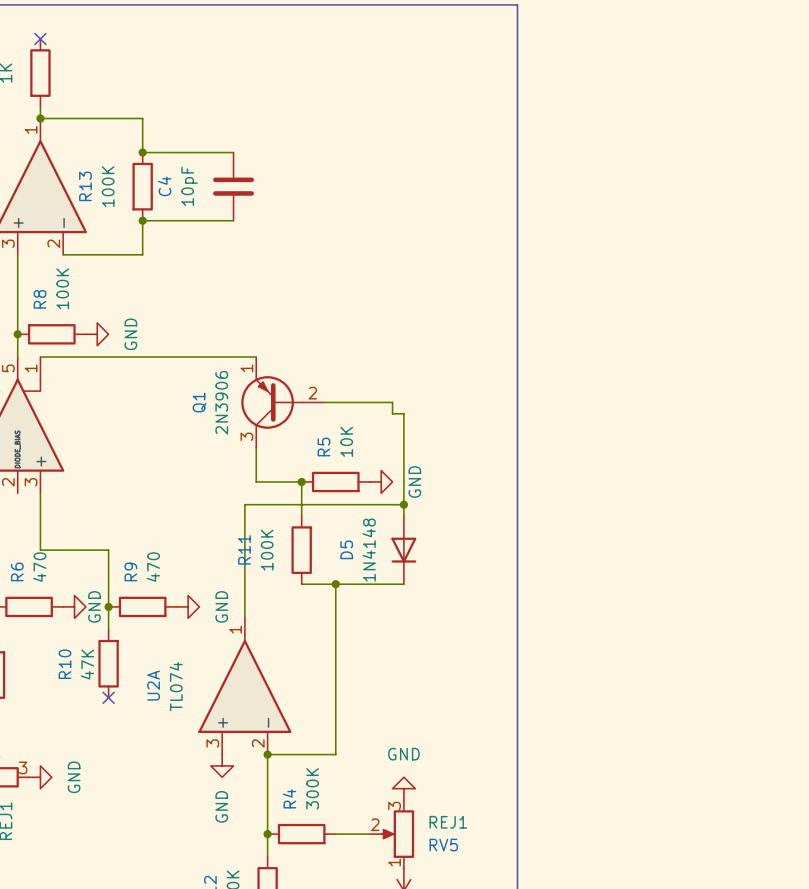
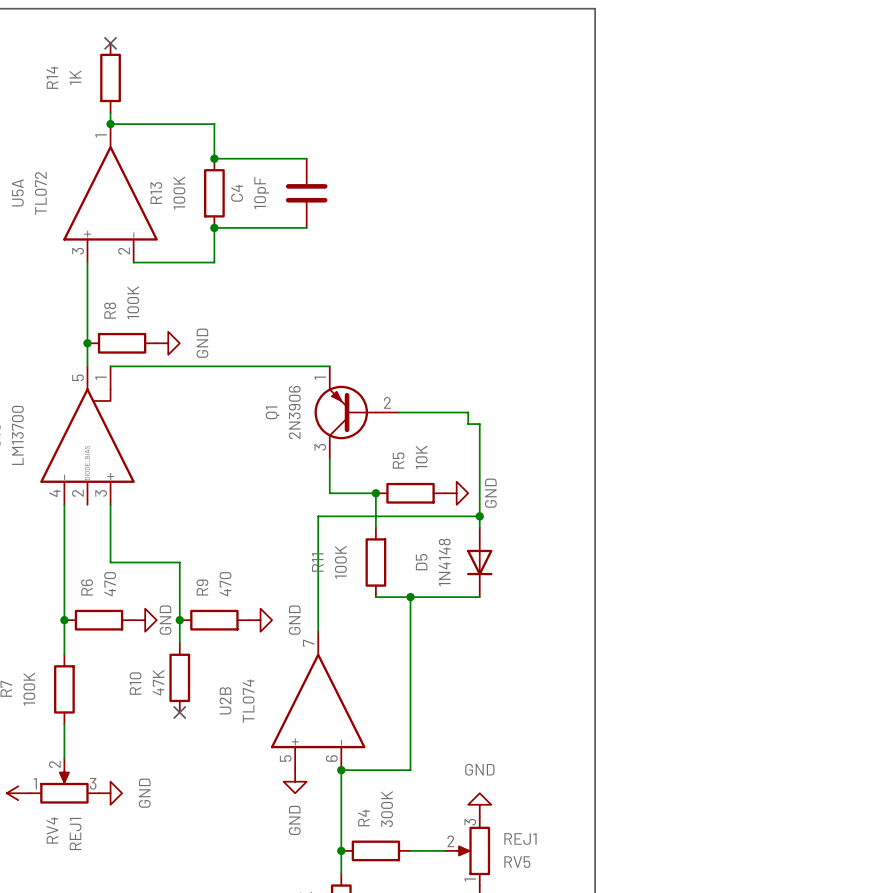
U2A pin number: 1 (235, 629) -> 7 (308, 643)
U2A name: U2A (153, 685) -> U2B (225, 700)
U2A pin number: 3 (212, 743) -> 5 (285, 758)
U2A pin number: 2 (258, 743) -> 6 (331, 758)

